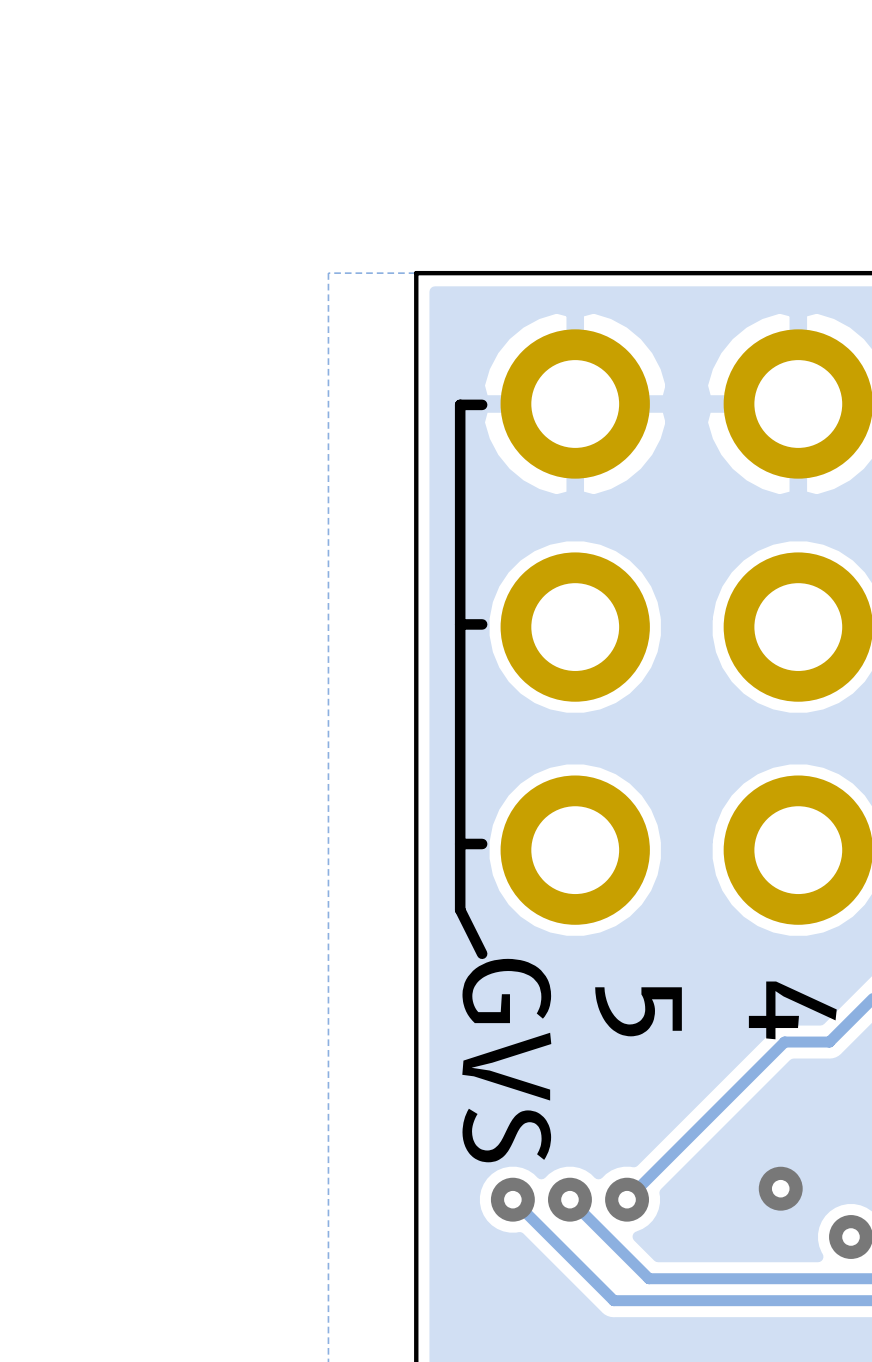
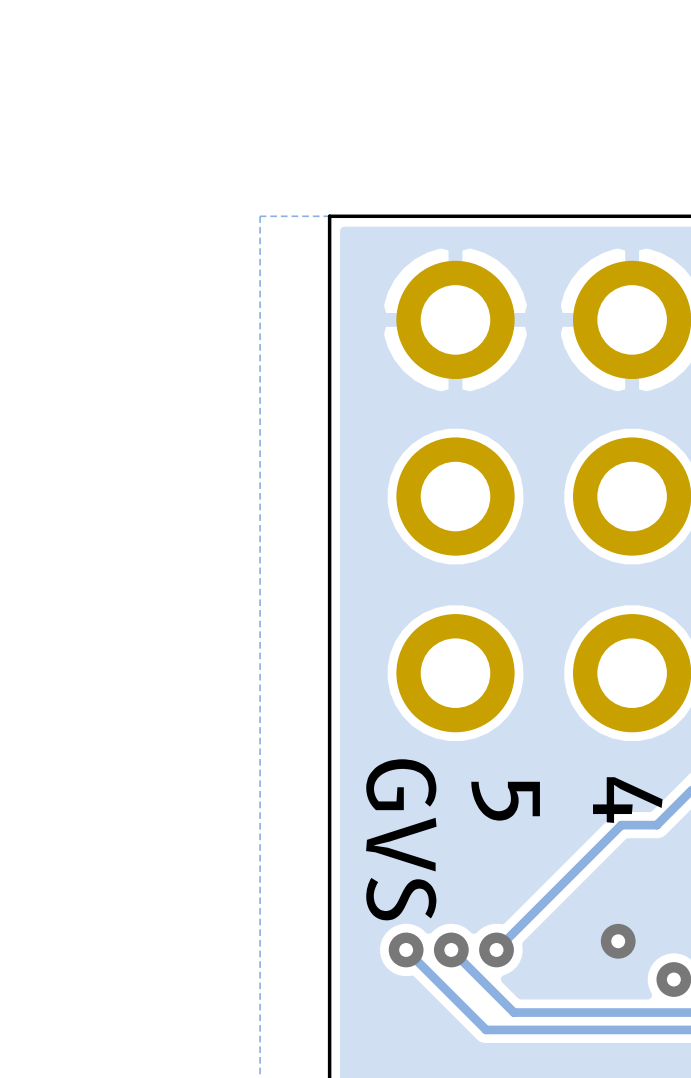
line: (482, 404) (460, 404) (460, 909) (482, 953) -> none
line: (482, 624) (460, 624) -> none
line: (482, 843) (460, 843) -> none

